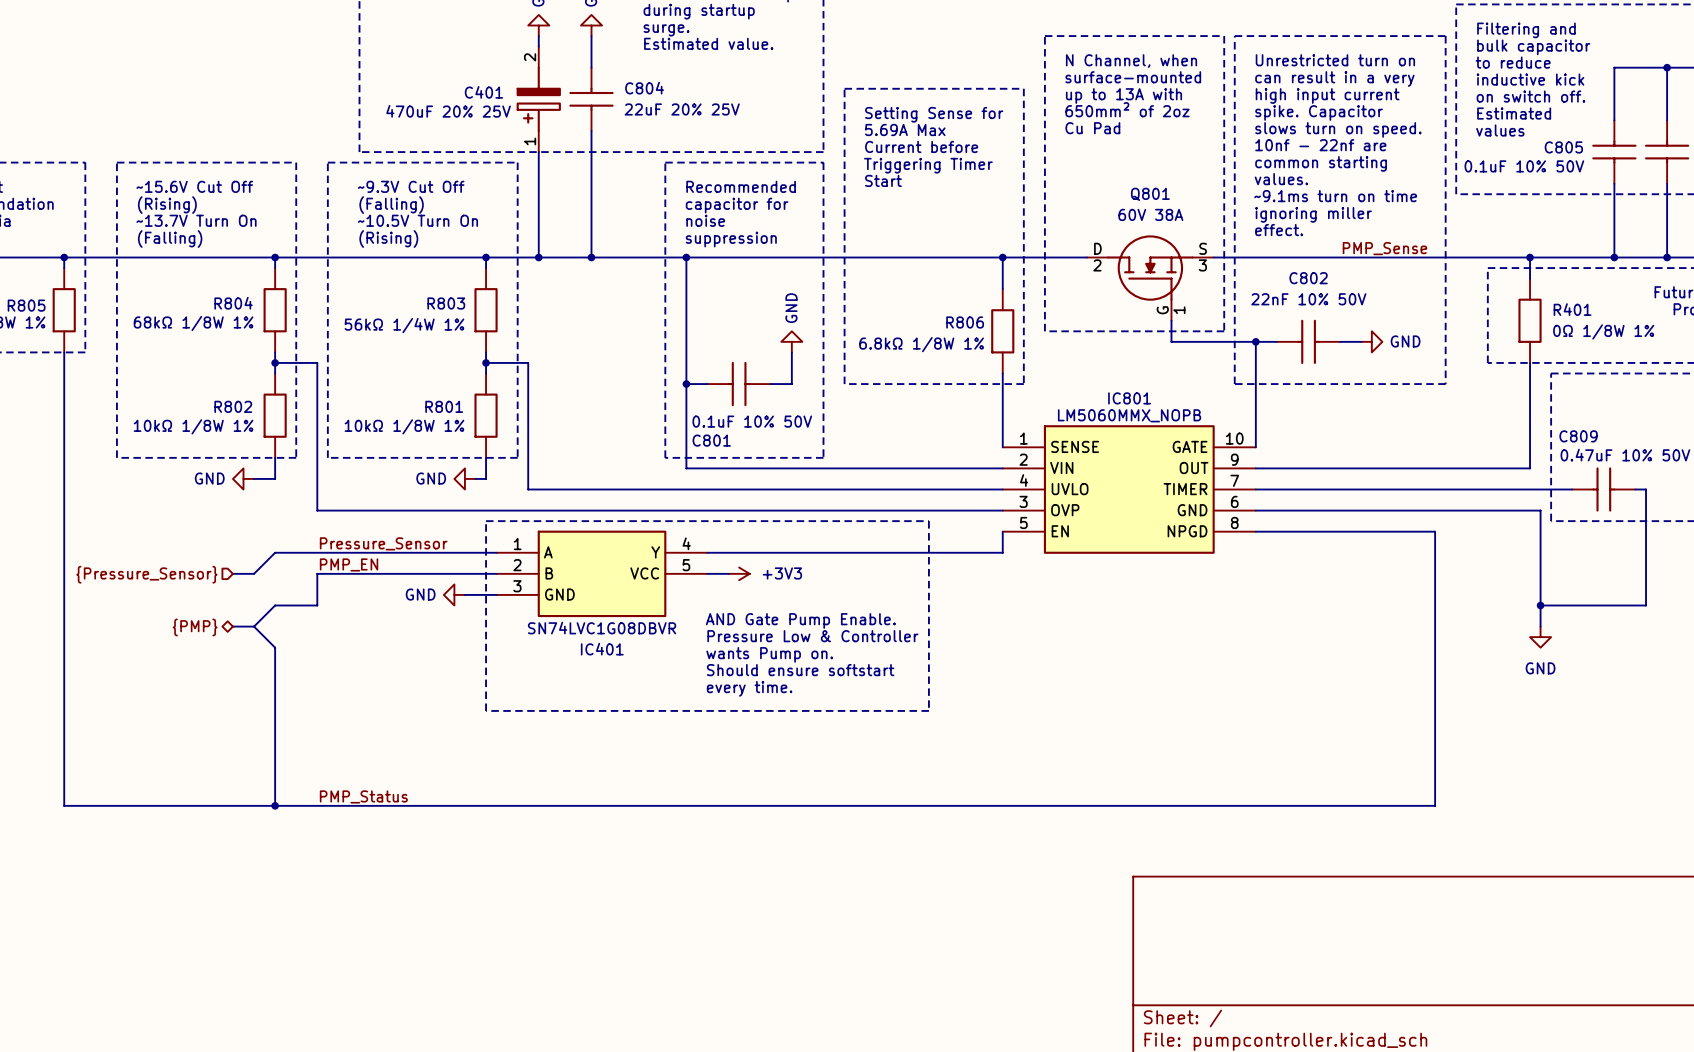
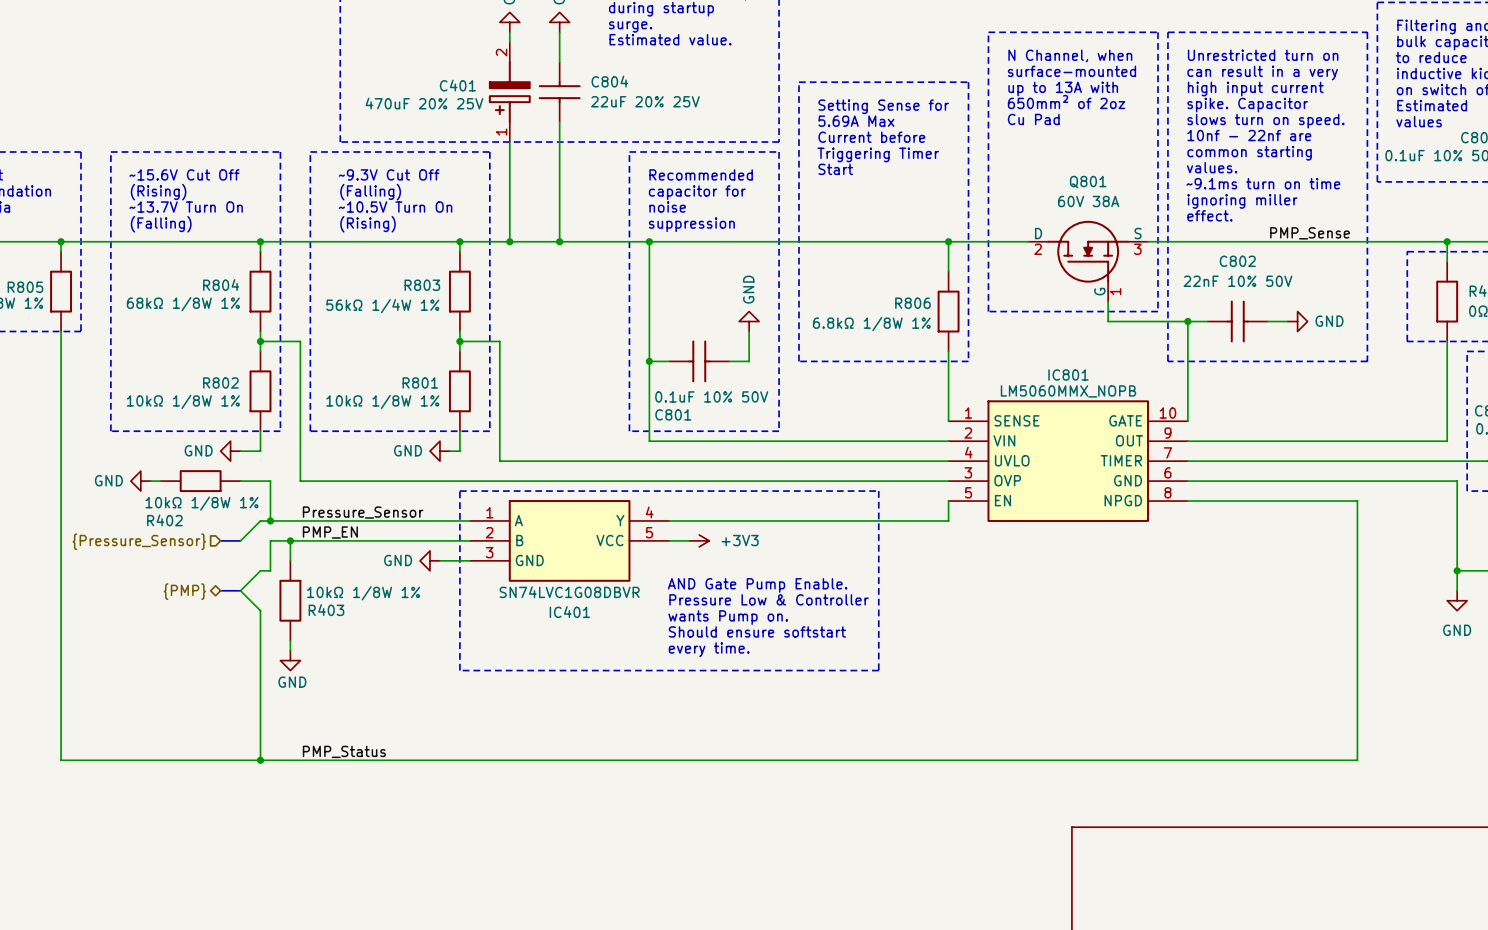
power symbol: none -> GND (140, 481)
wire: none -> (150, 481) (160, 481)
R402: none -> 10kΩ 1/8W 1% (200, 481)
wire: none -> (240, 481) (270, 481) (270, 520)
junction: none -> (270, 520)
wire: none -> (290, 540) (290, 560)
junction: none -> (290, 540)
wire: (317, 573) (317, 605) (285, 605) -> (300, 540) (270, 540) (270, 570)
R403: none -> 10kΩ 1/8W 1% (290, 600)
wire: none -> (290, 640) (290, 650)
power symbol: none -> GND (290, 660)

